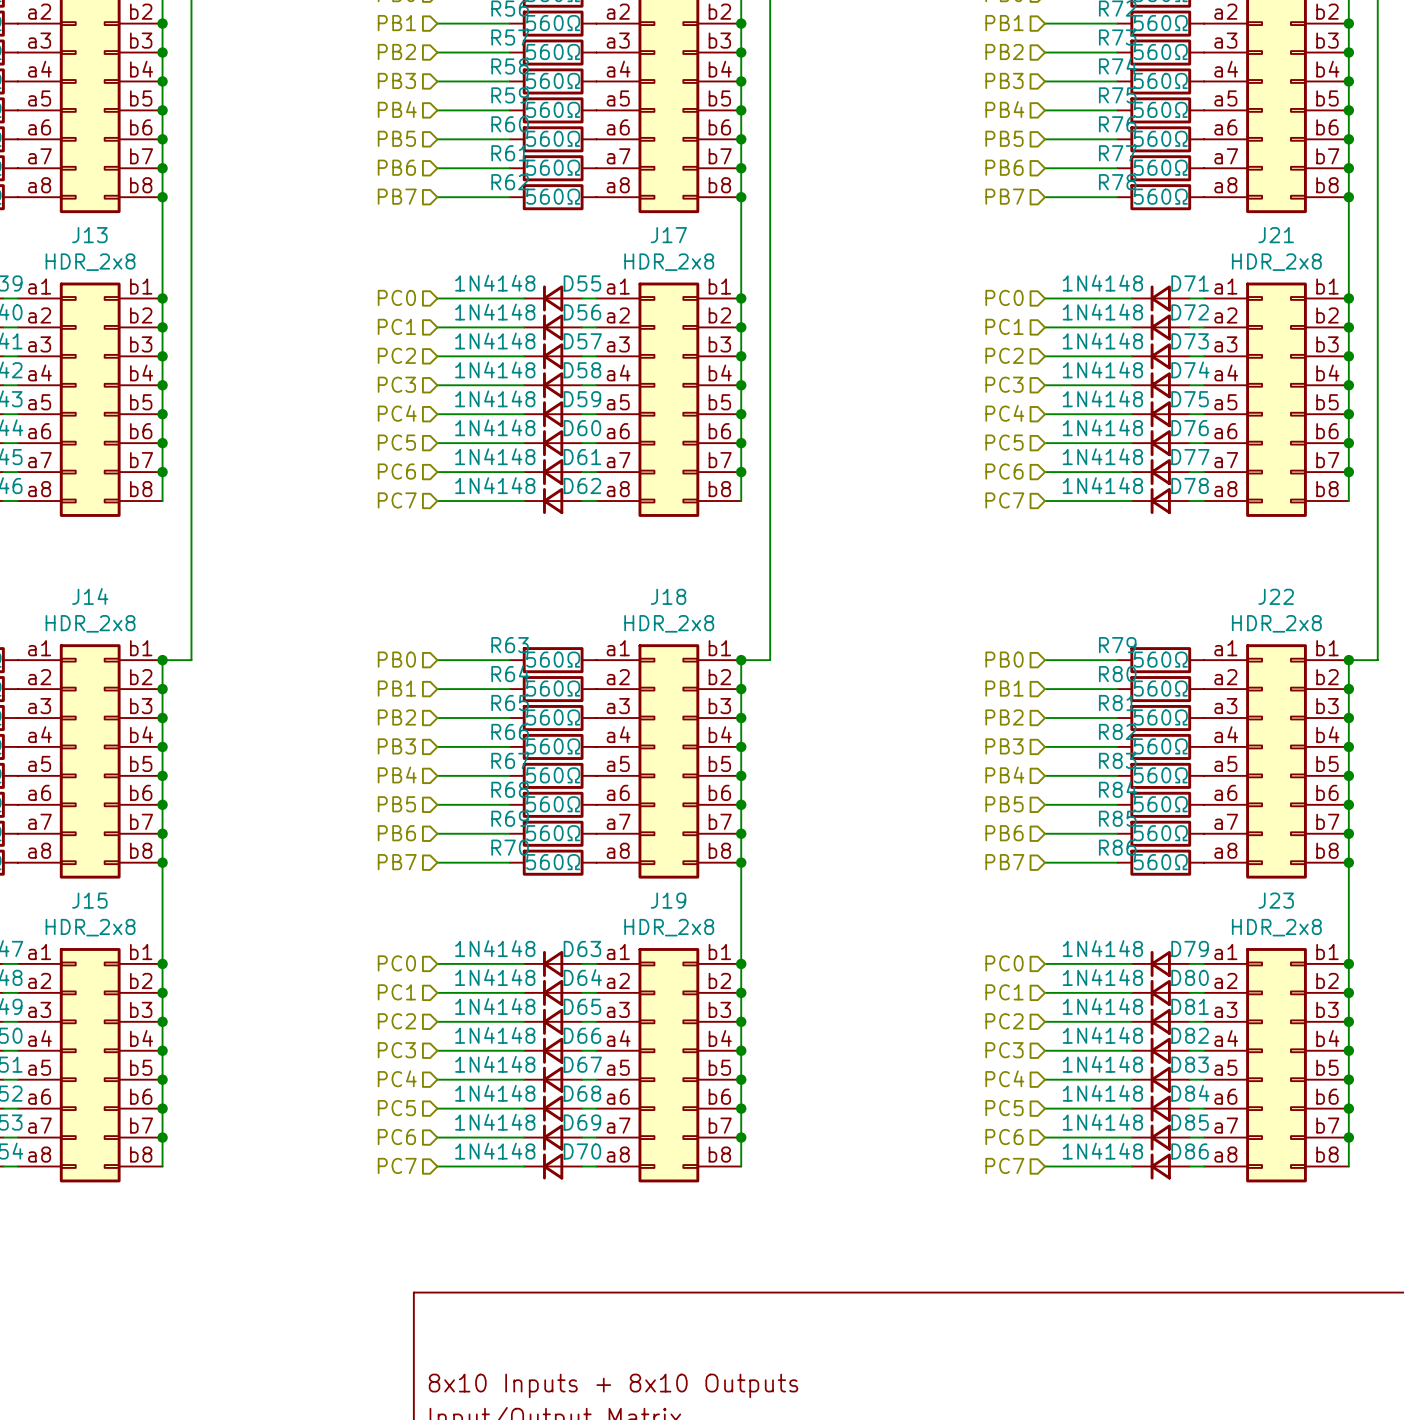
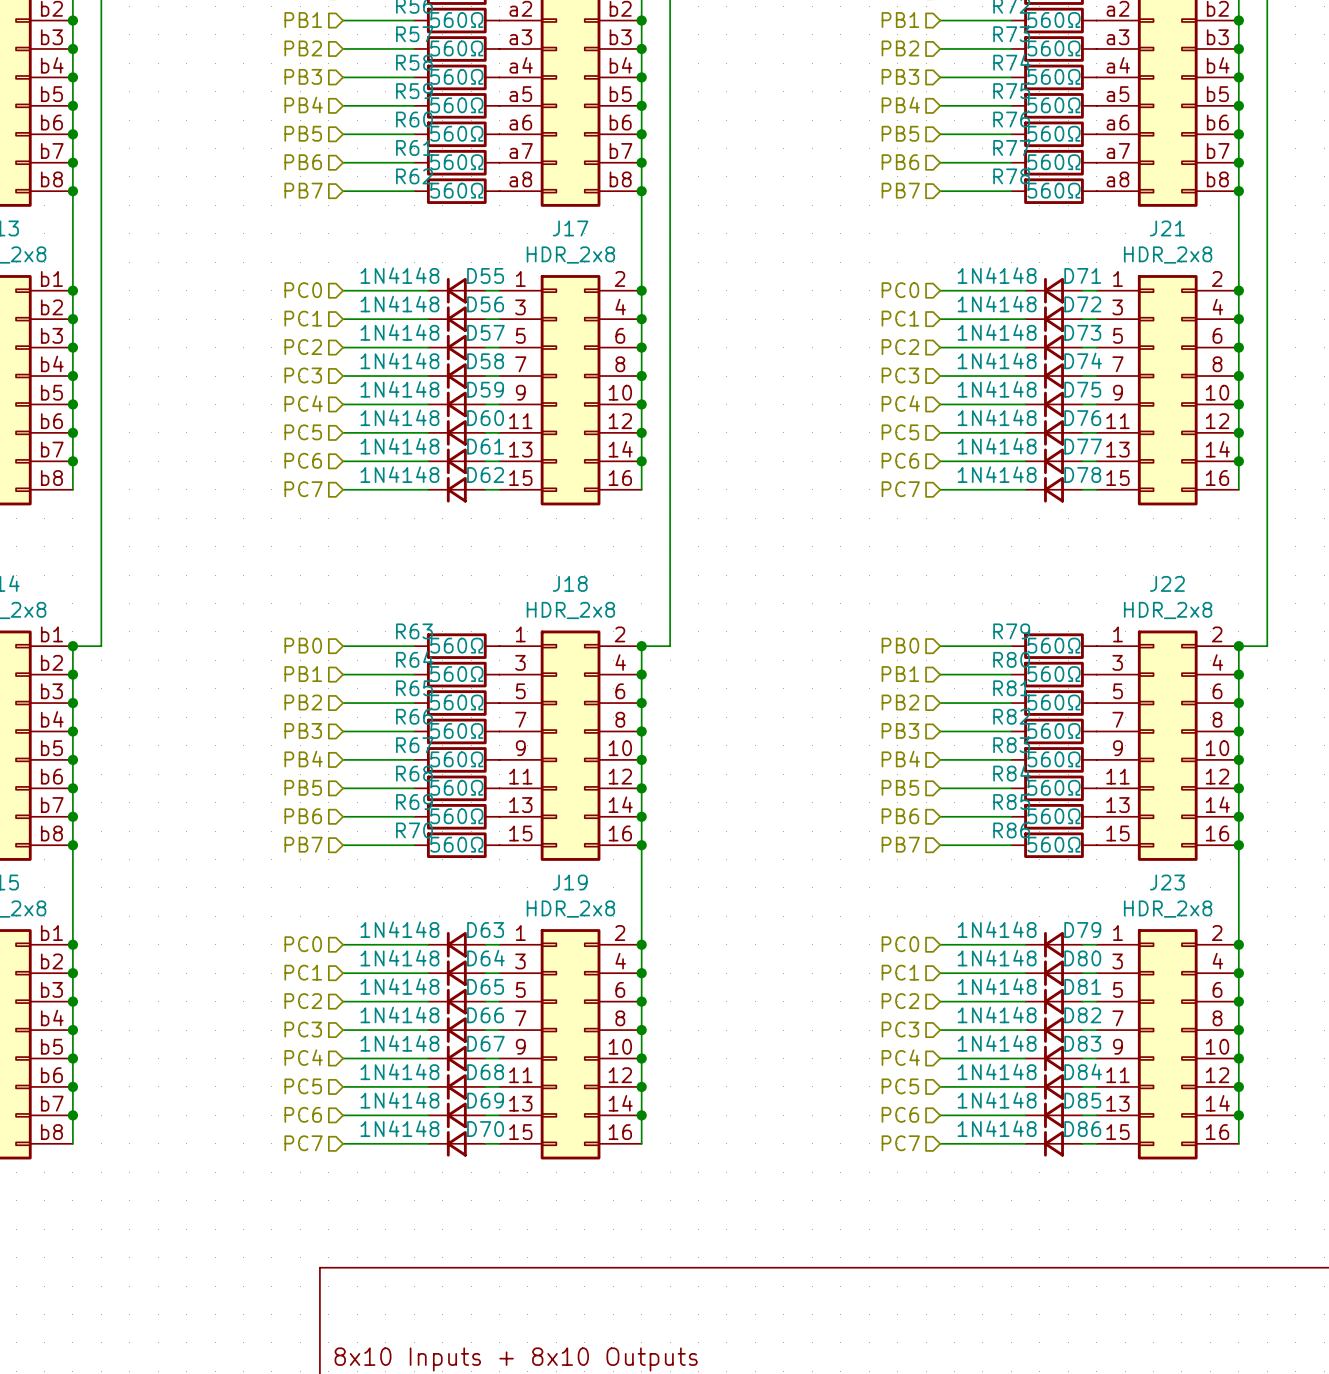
J17 symbol: [596, 282, 742, 517] -> [499, 275, 642, 506]
J21 symbol: [1204, 282, 1349, 517] -> [1096, 275, 1239, 506]
J18 symbol: [596, 644, 742, 879] -> [499, 630, 642, 861]
J22 symbol: [1204, 644, 1349, 879] -> [1096, 630, 1239, 861]
J19 symbol: [596, 948, 742, 1183] -> [499, 929, 642, 1160]
J23 symbol: [1204, 948, 1349, 1183] -> [1096, 929, 1239, 1160]

